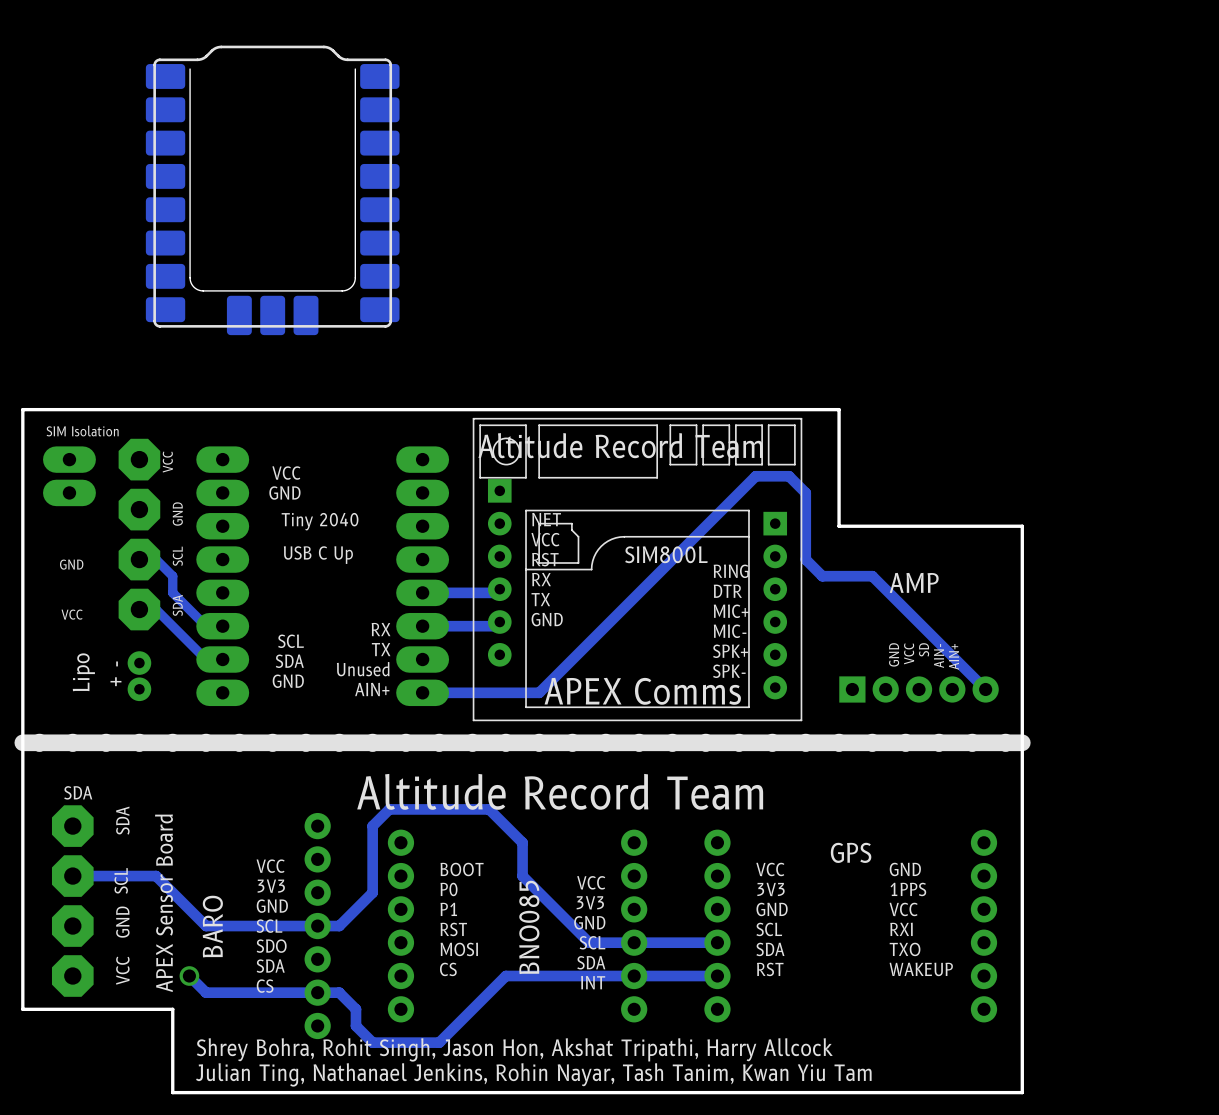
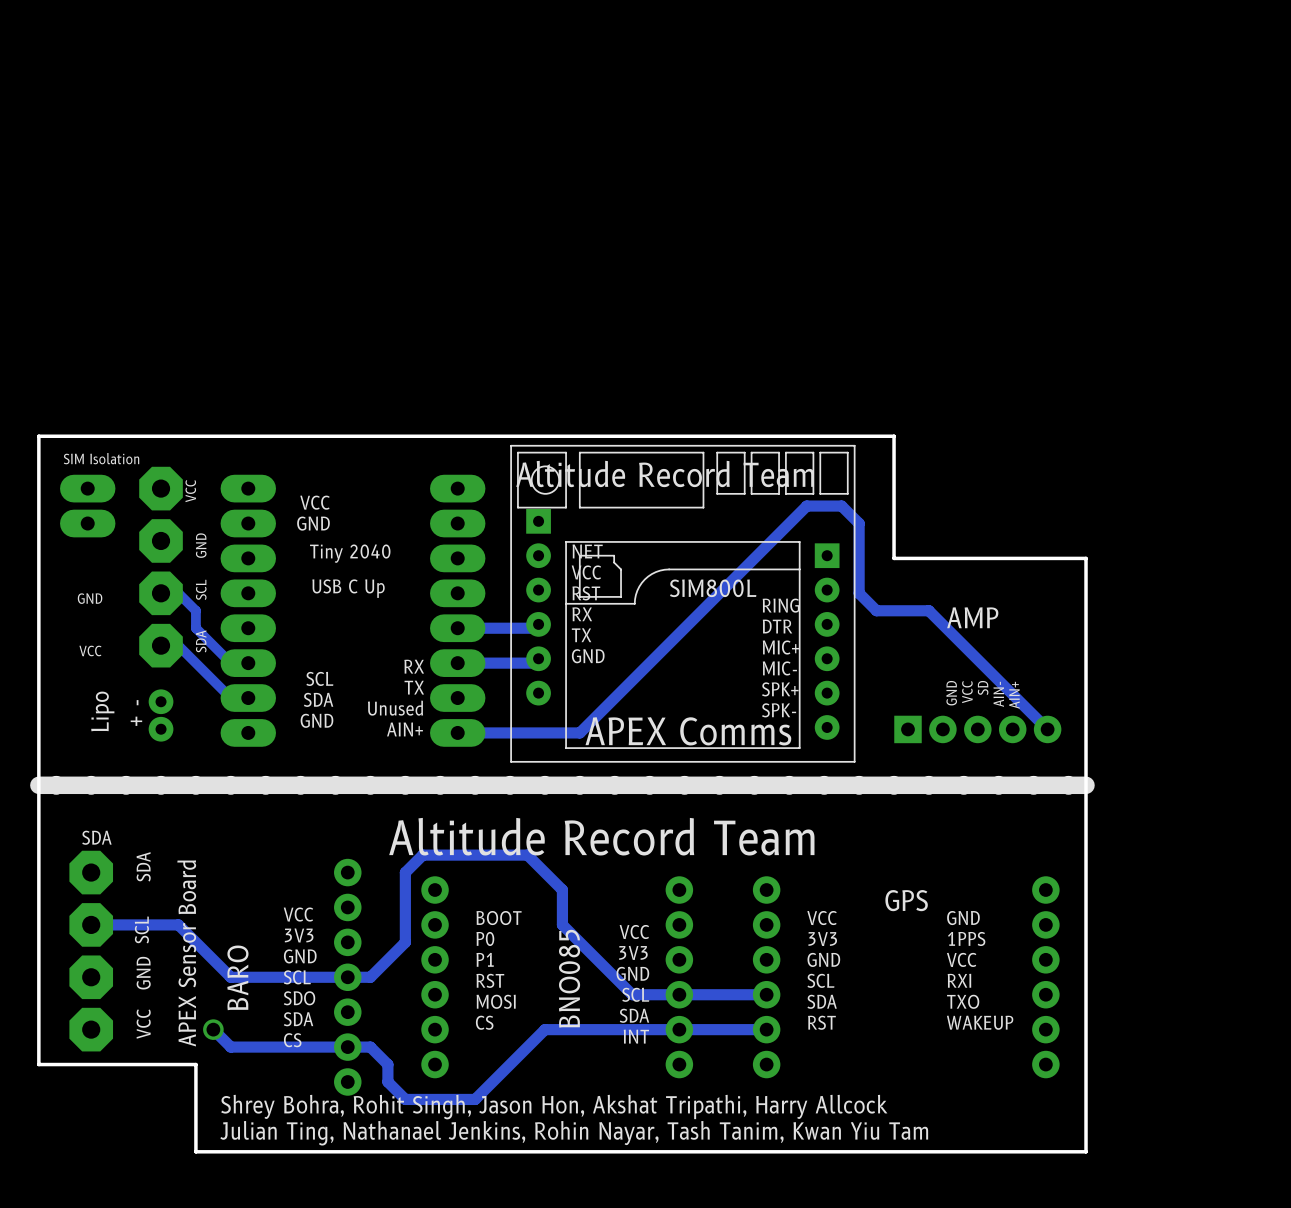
part: (272, 190) -> none

